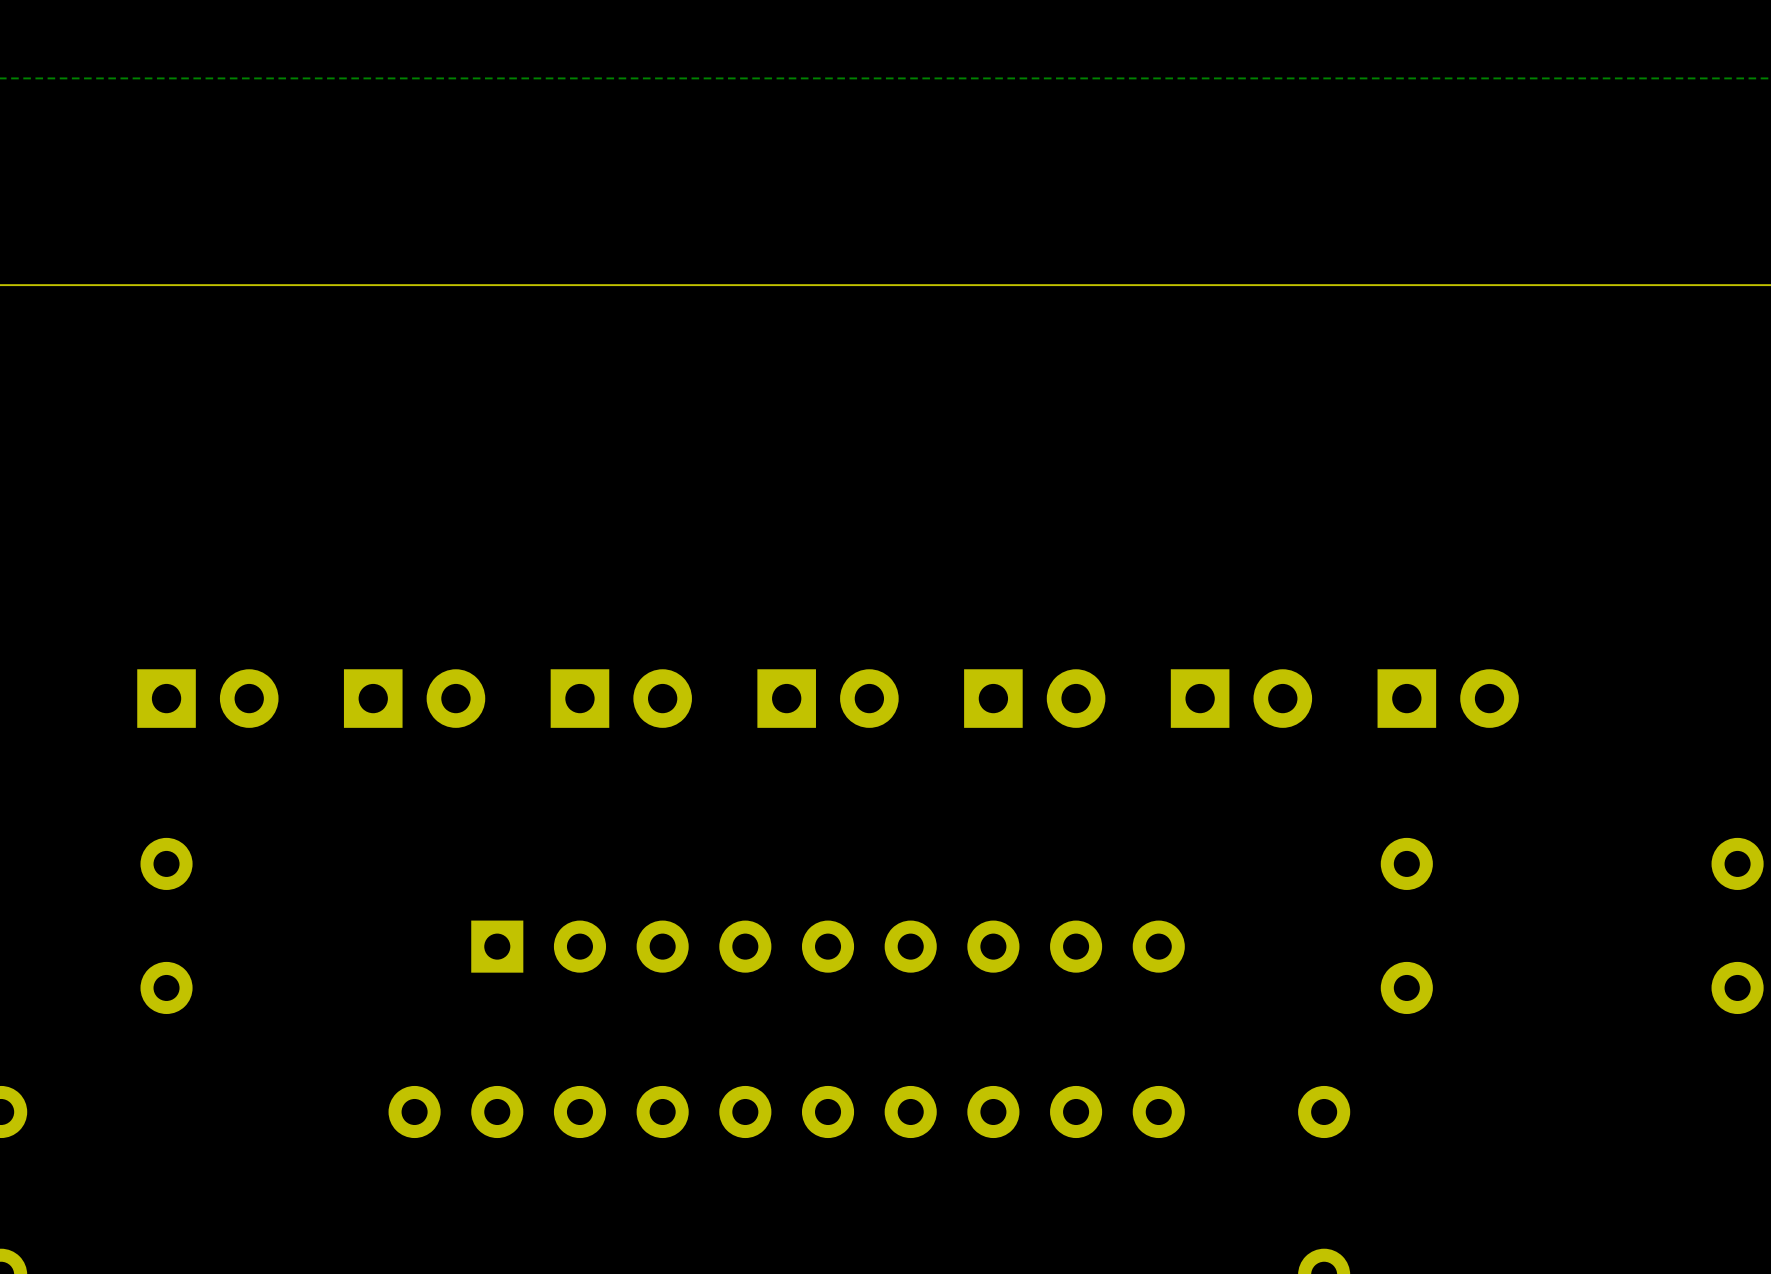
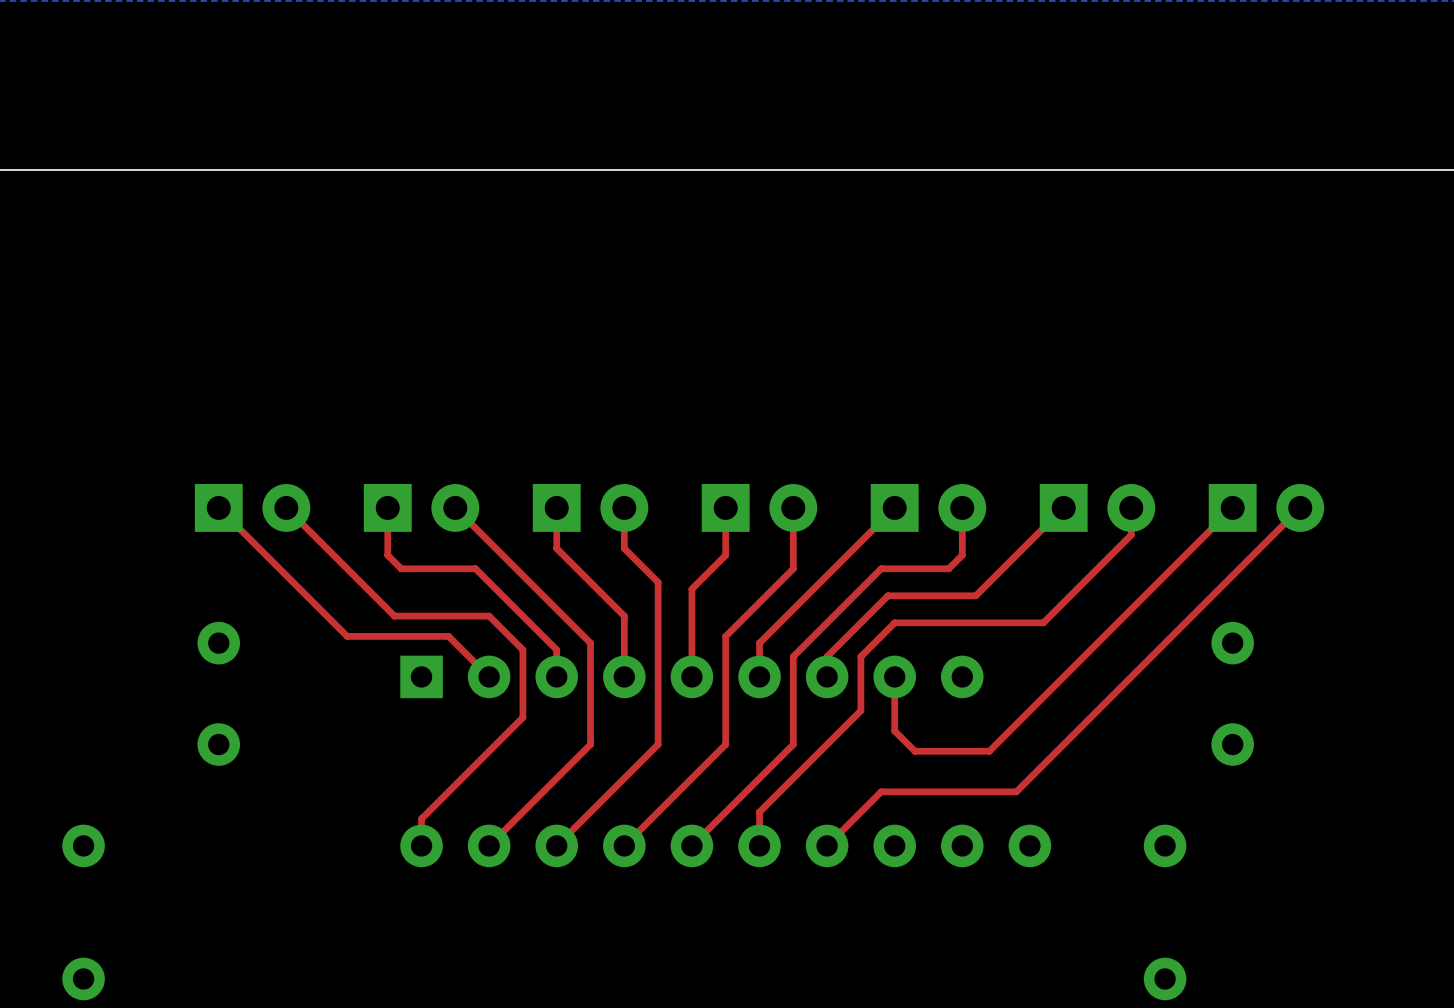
top track: none -> (218, 507) (347, 636) (448, 636) (489, 676)
top track: none -> (286, 507) (394, 616) (489, 616) (522, 649) (522, 717) (421, 818) (421, 845)
top track: none -> (387, 507) (387, 555) (401, 568) (475, 568) (556, 649) (556, 676)
top track: none -> (455, 507) (590, 643) (590, 744) (489, 845)
top track: none -> (556, 507) (556, 548) (624, 616) (624, 676)
top track: none -> (624, 507) (624, 548) (658, 582) (658, 744) (556, 845)
top track: none -> (725, 507) (725, 555) (691, 589) (691, 676)
top track: none -> (793, 507) (793, 568) (725, 636) (725, 744) (624, 845)
top track: none -> (894, 507) (759, 643) (759, 676)
top track: none -> (962, 507) (962, 555) (948, 568) (881, 568) (793, 656) (793, 744) (691, 845)
top track: none -> (1063, 507) (975, 595) (887, 595) (827, 656) (827, 676)
top track: none -> (1131, 507) (1131, 534) (1043, 622) (894, 622) (860, 656) (860, 710) (759, 812) (759, 845)
top track: none -> (1232, 507) (989, 751) (914, 751) (894, 731) (894, 676)
top track: none -> (1300, 507) (1016, 791) (881, 791) (827, 845)
part position: (828, 946) -> (691, 676)

